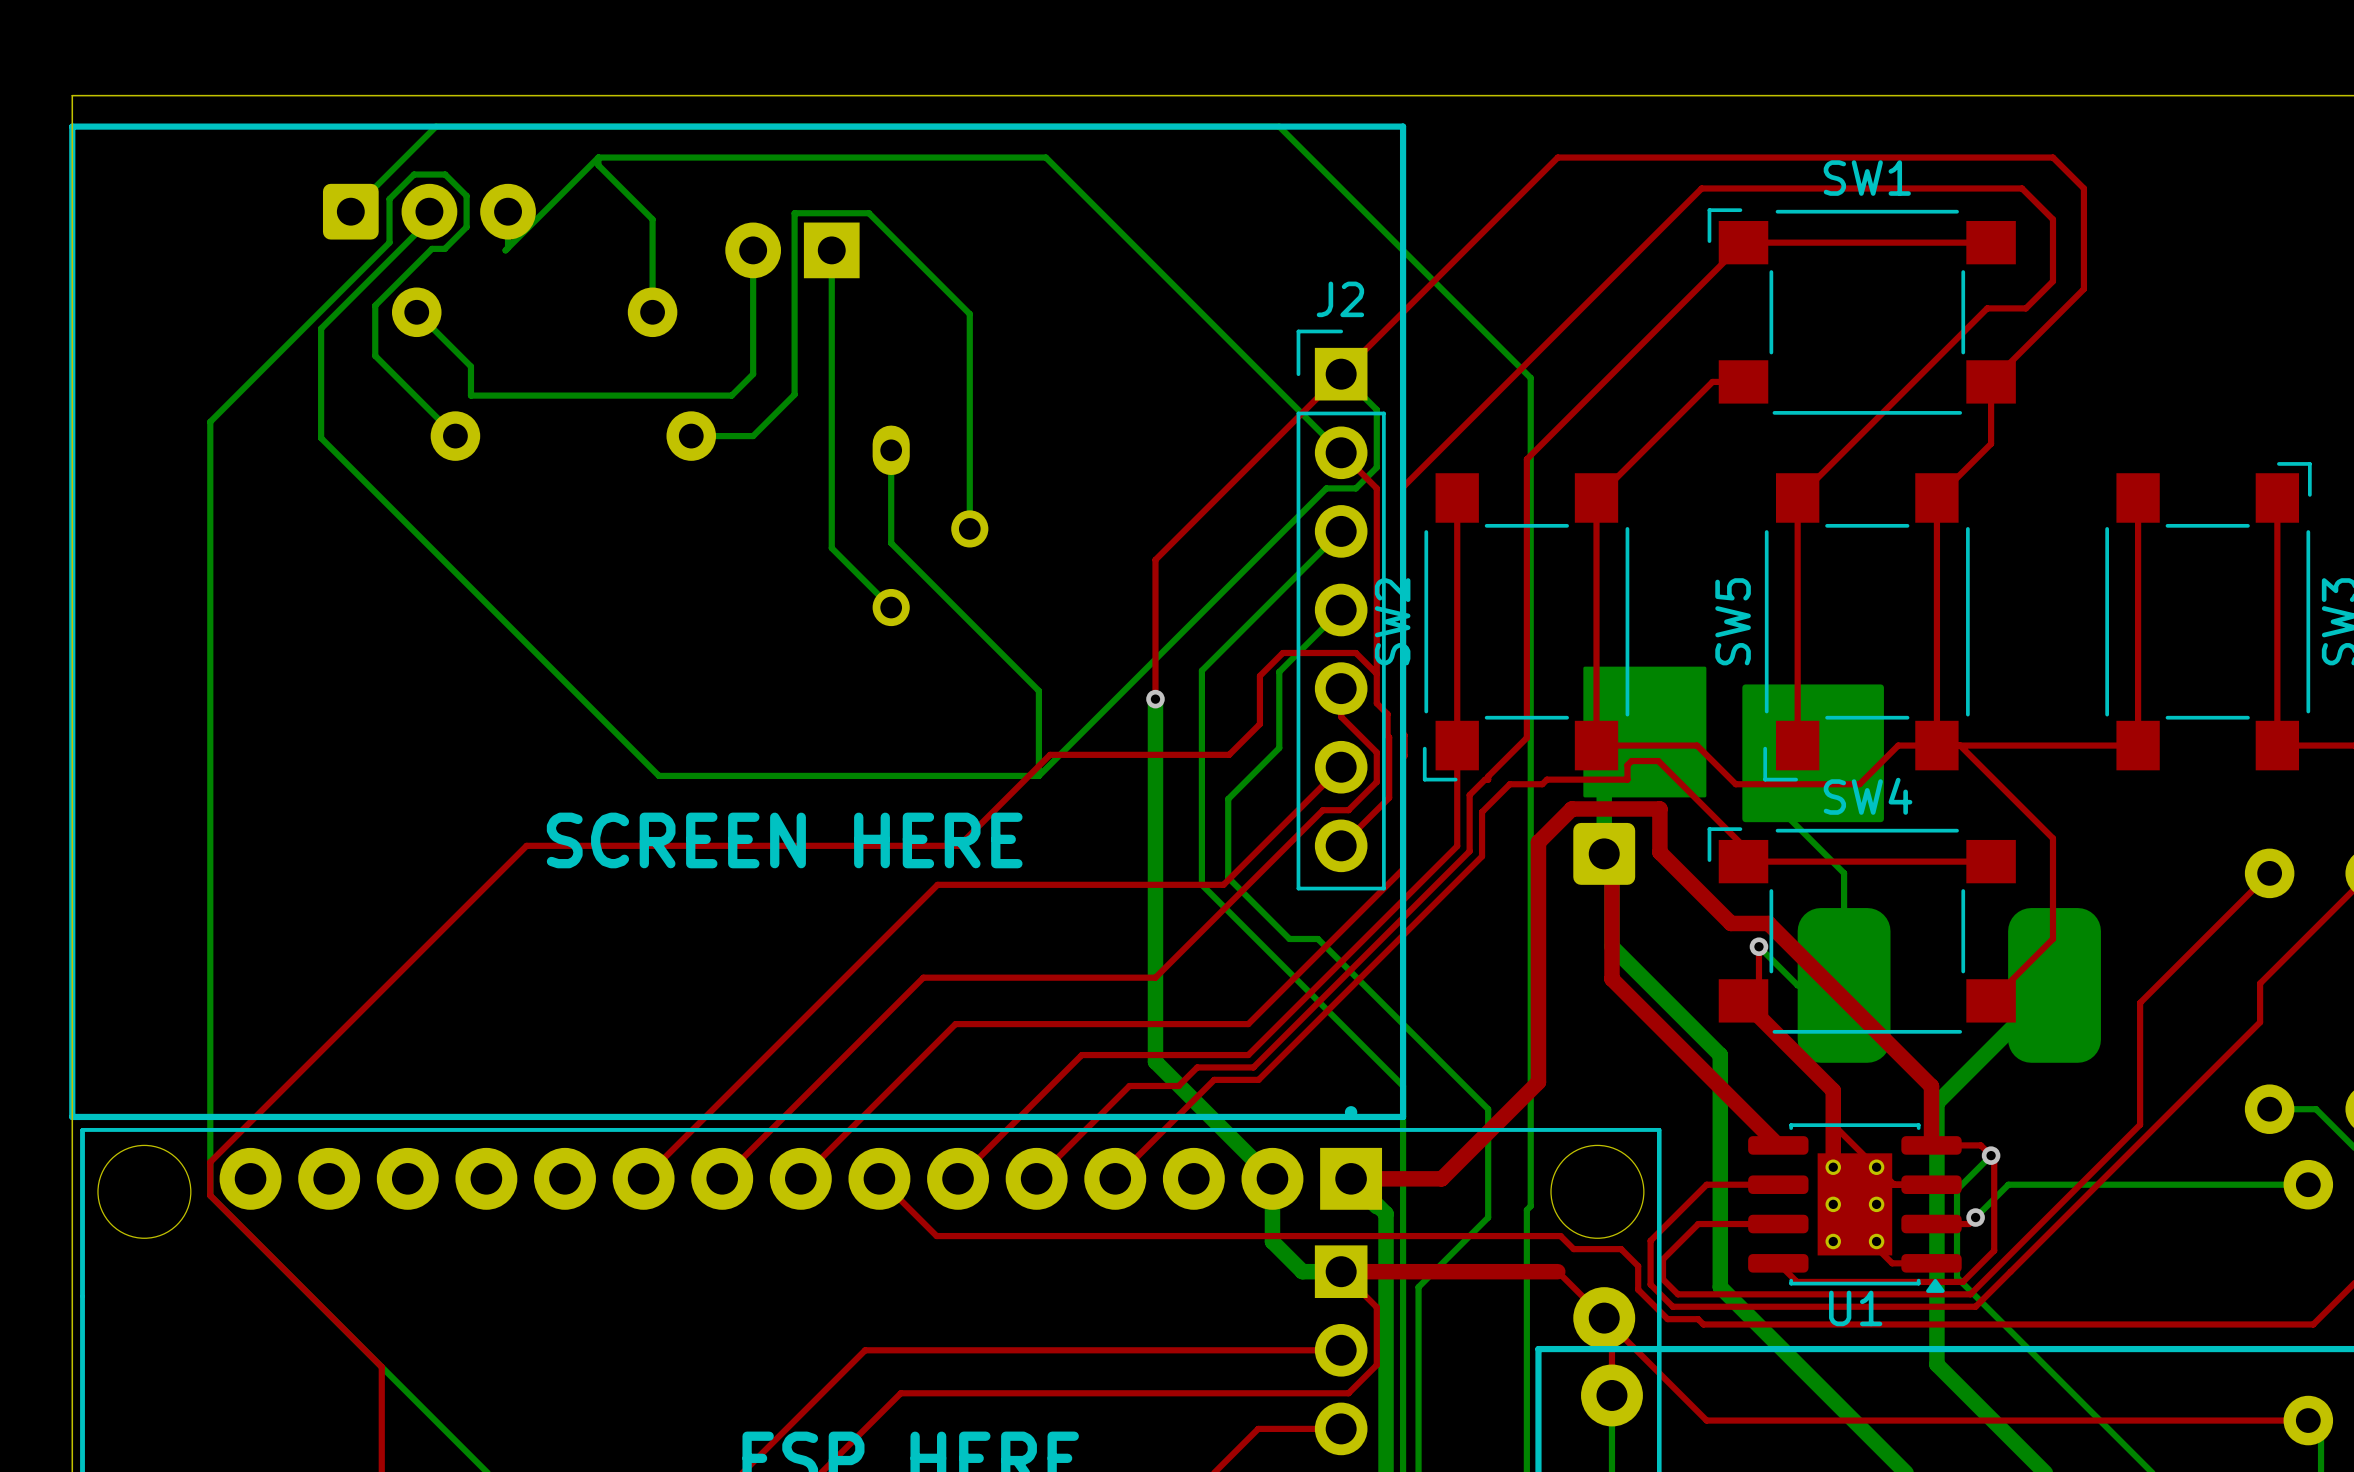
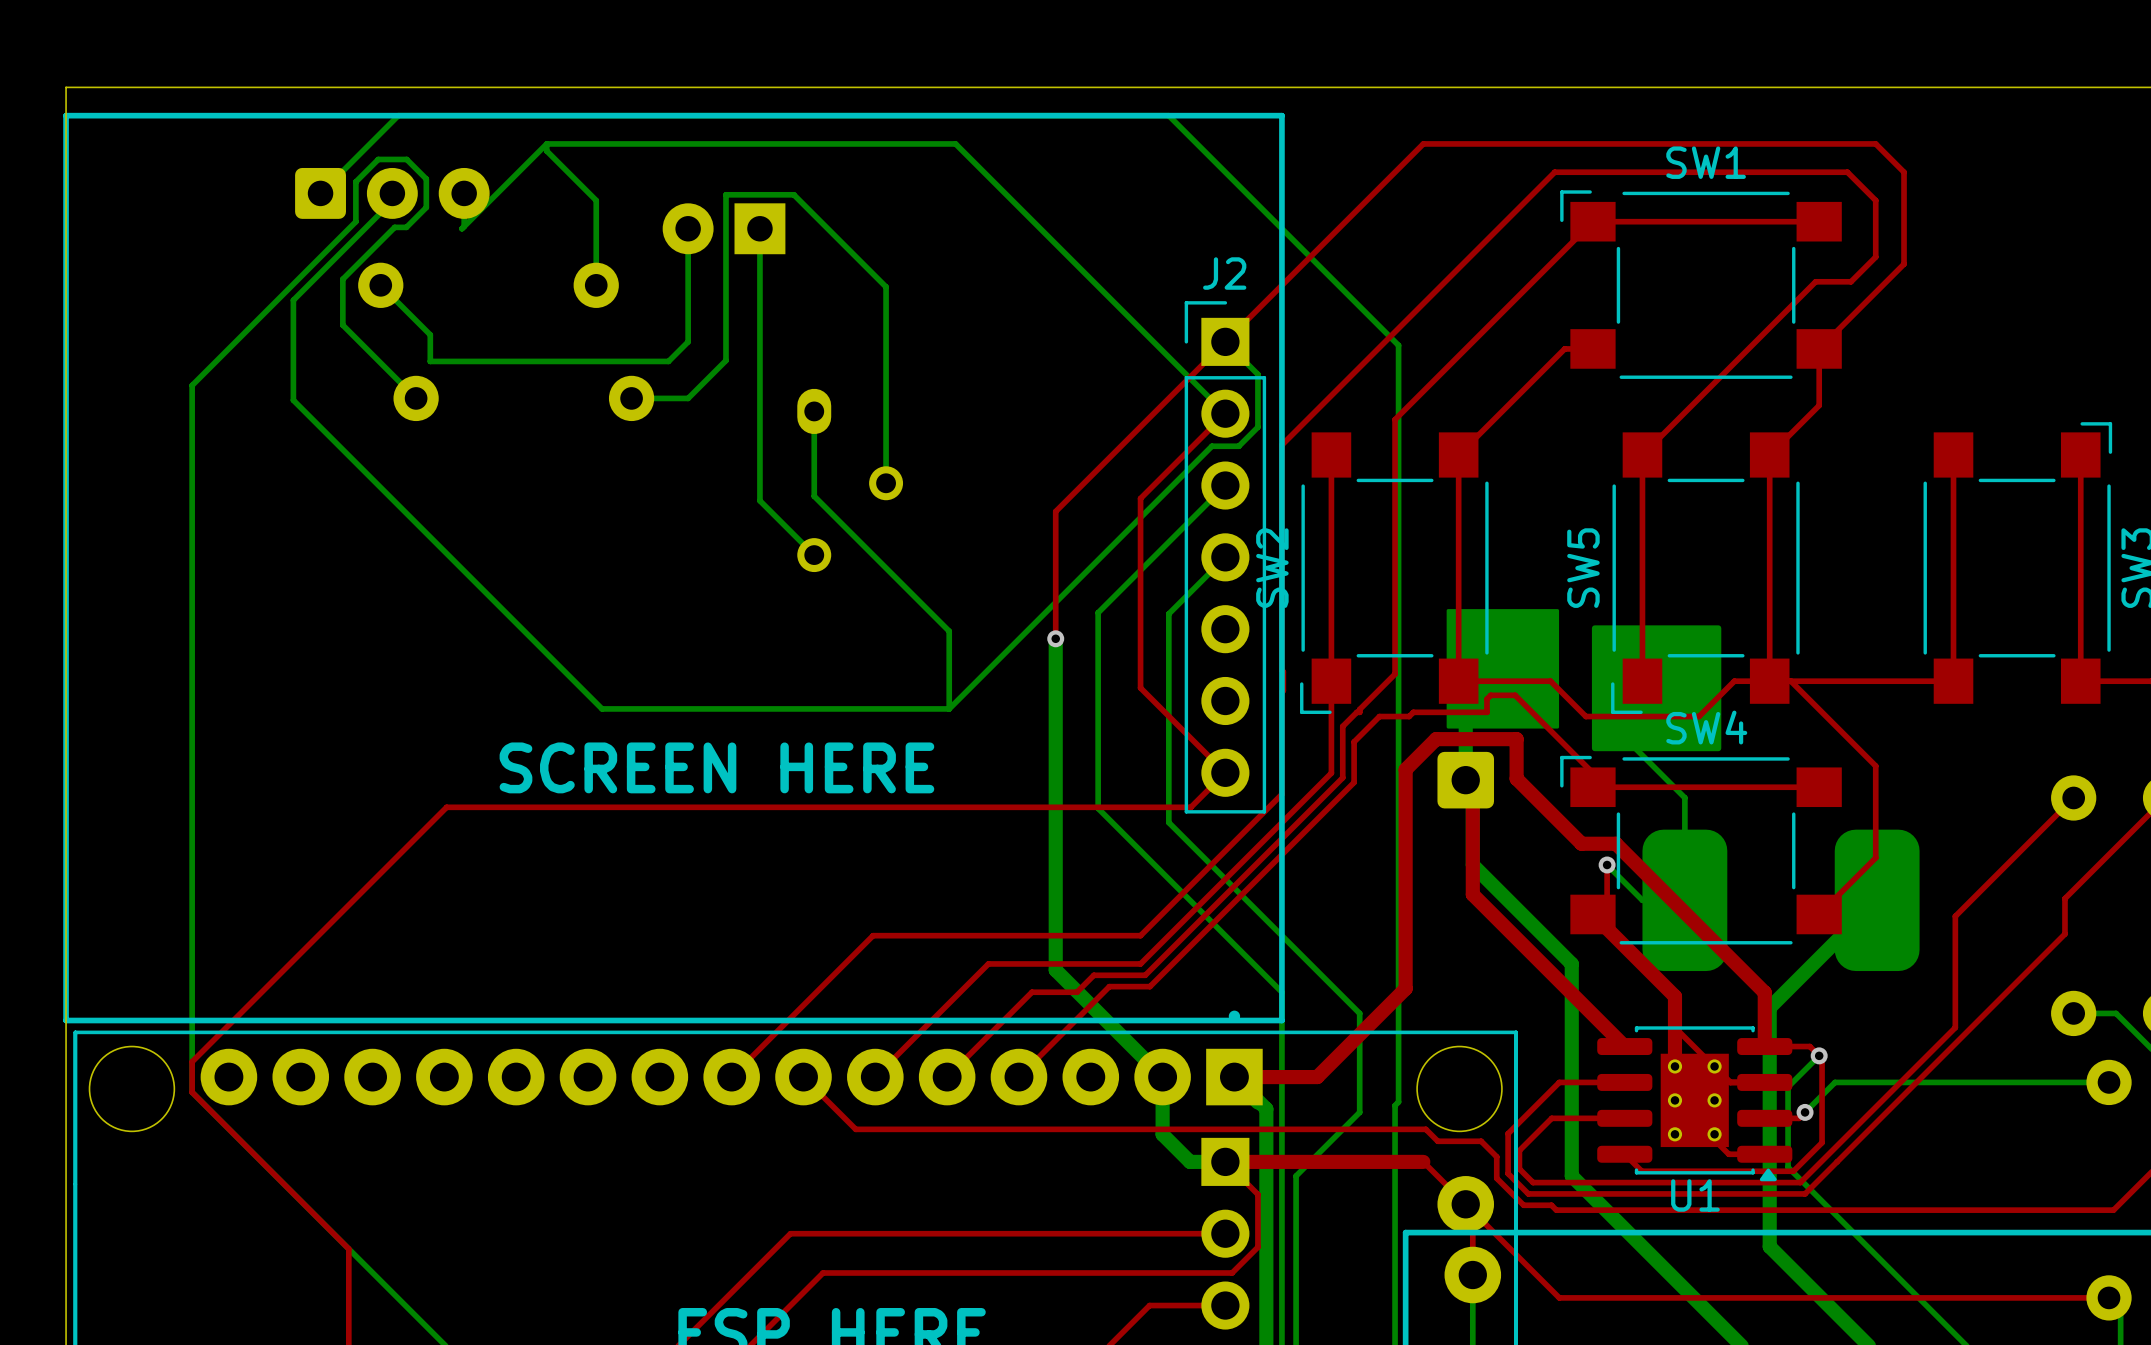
top track: (1341, 452) (1376, 488) (1376, 703) (1387, 714) (1389, 737) (1389, 797) (1341, 845) -> none
top track: (1376, 673) (1355, 652) (1282, 652) (1259, 675) (1259, 724) (1229, 754) (1050, 754) (959, 845) (526, 845) (488, 883) -> (1225, 413) (1140, 498) (1140, 687) (1225, 772) (1190, 807) (446, 807)
top track: (1341, 688) (1341, 716) (1376, 752) (1376, 781) (1348, 810) (1322, 810) (1155, 977) (923, 977) (722, 1178) -> none
bottom track: (1279, 748) (1228, 799) (1228, 877) (1289, 938) (1317, 938) -> (1168, 683) (1168, 822) (1204, 857)
top track: (1341, 767) (1223, 884) (937, 884) (643, 1178) -> none

